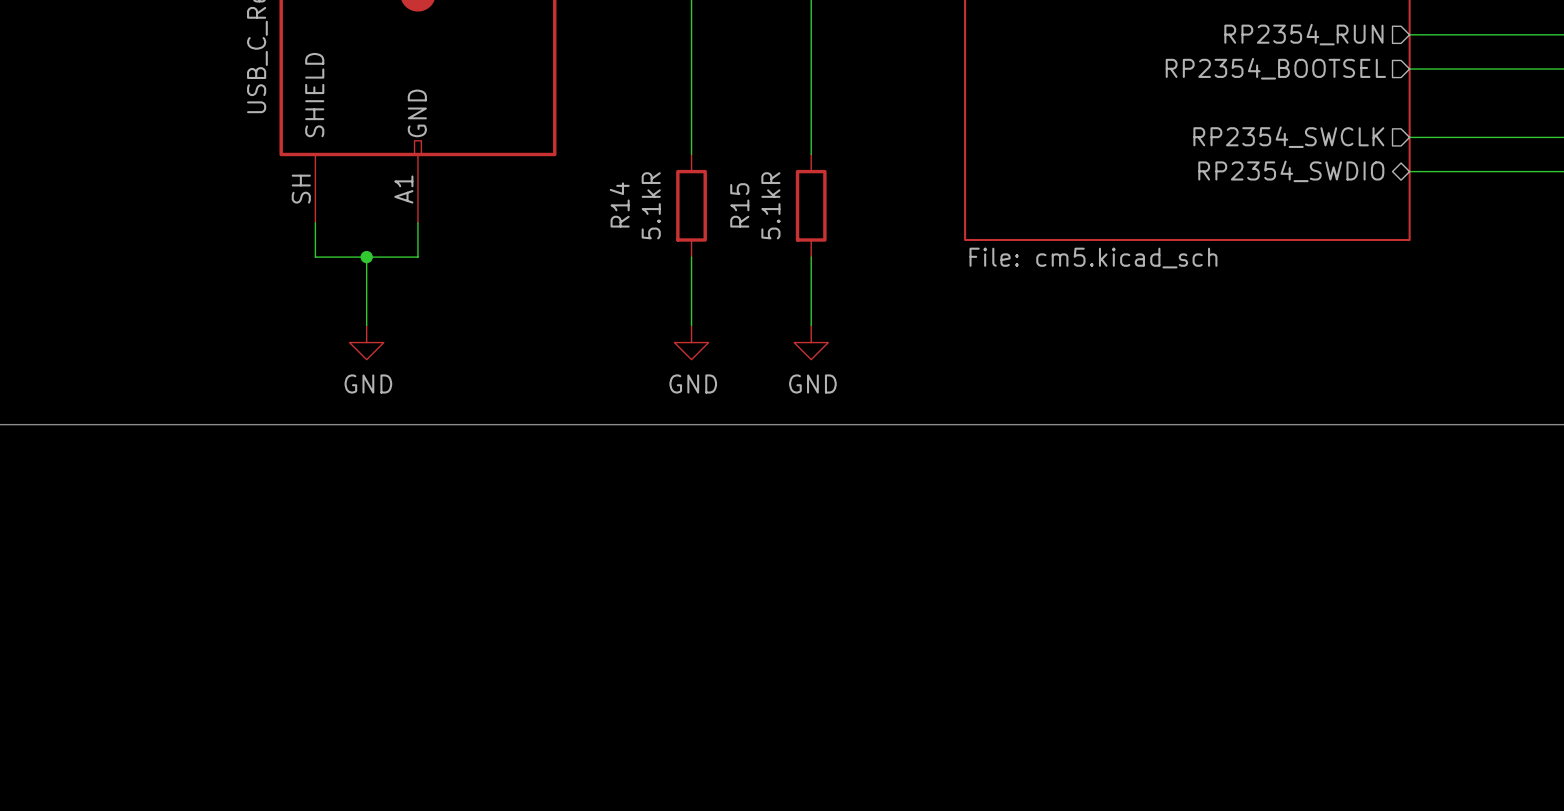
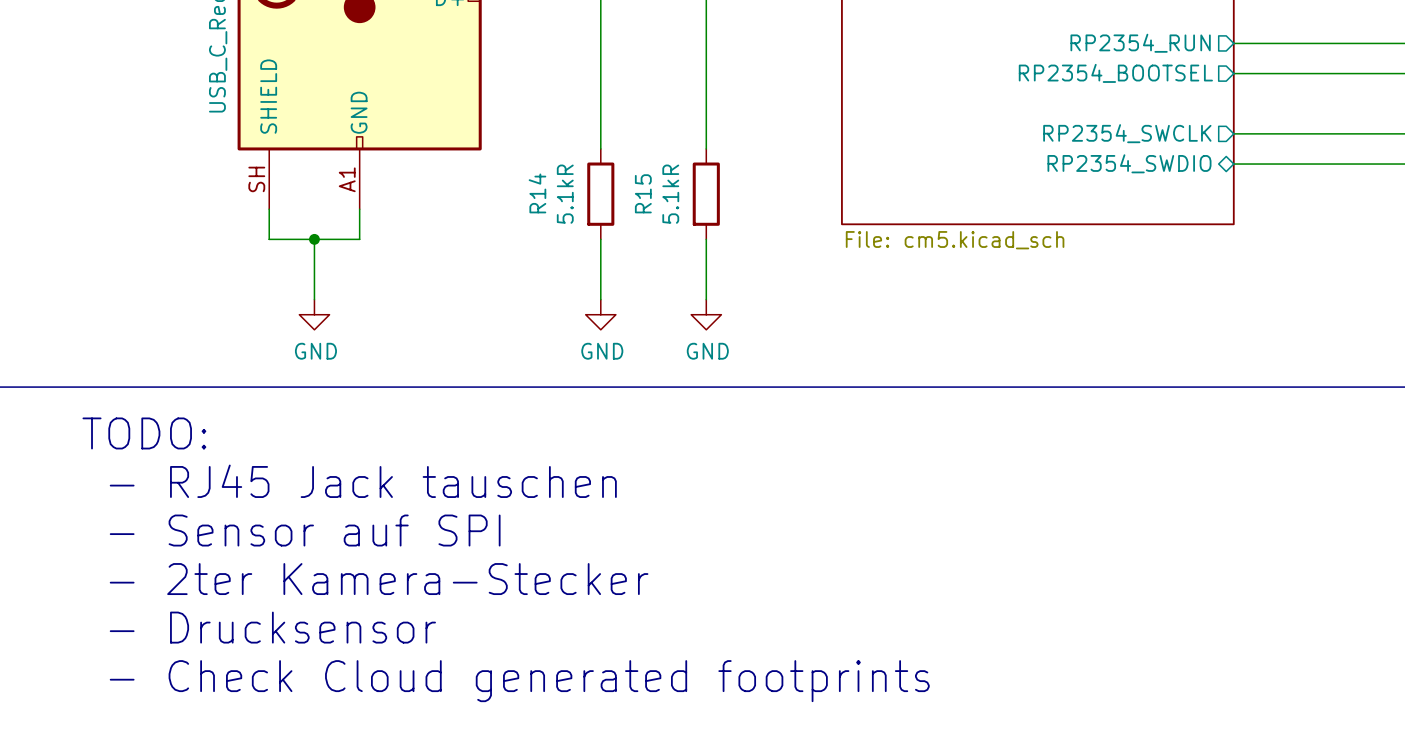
text: none -> TODO: (144, 433)
text: none -> - RJ45 Jack tauschen (363, 481)
text: none -> - Sensor auf SPI (305, 530)
text: none -> - 2ter Kamera-Stecker (379, 579)
text: none -> - Drucksensor (272, 627)
text: none -> - Check Cloud generated footprints (519, 681)

